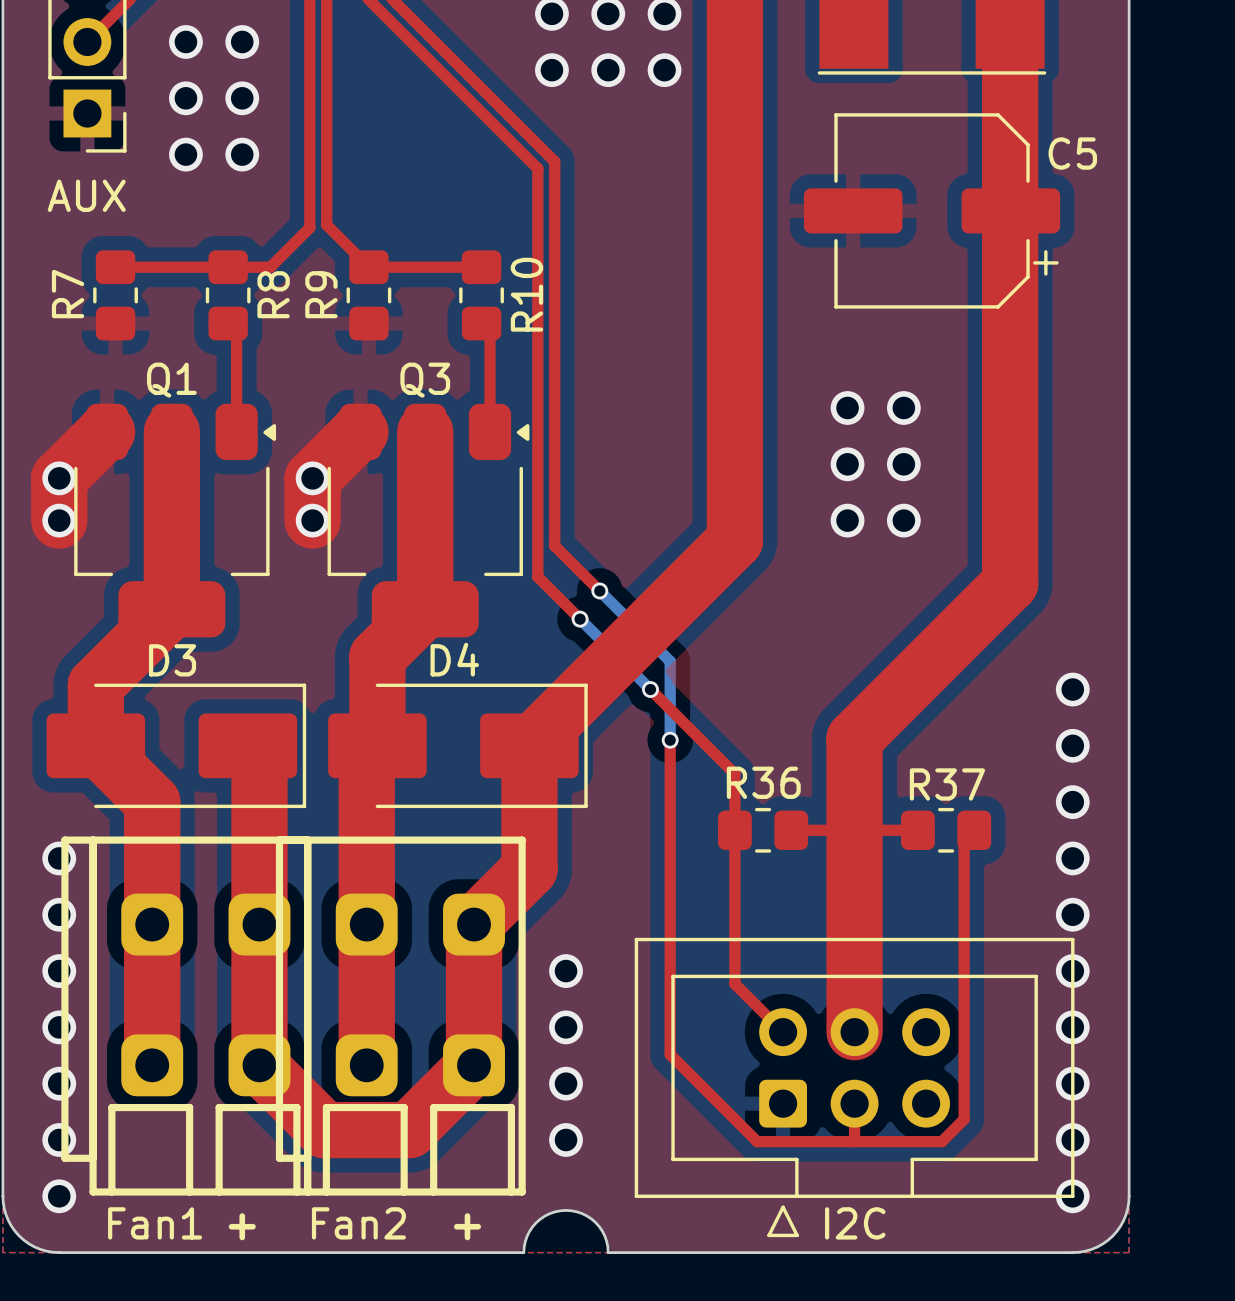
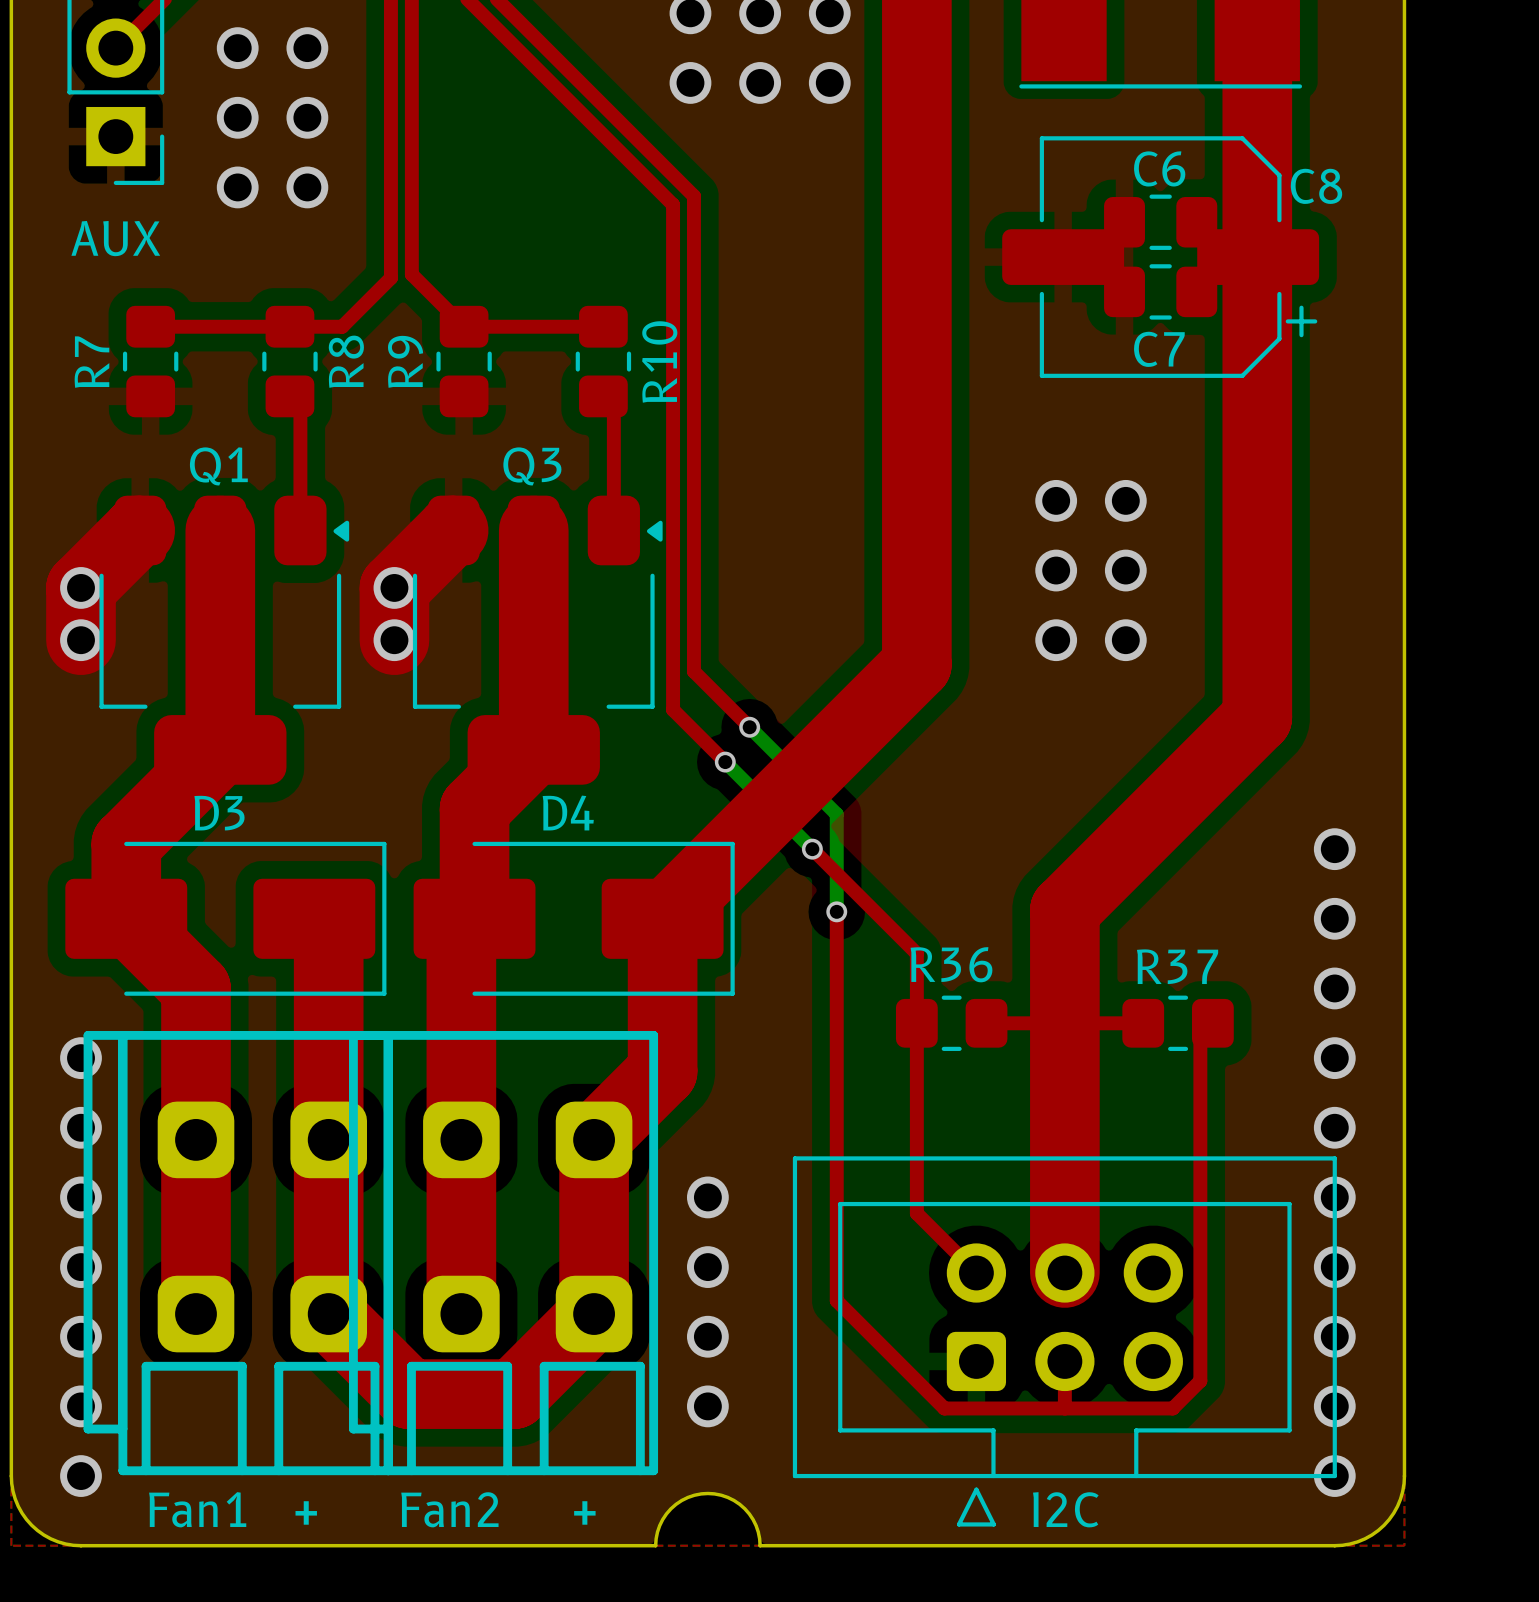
C5 name: C5 (1072, 153) -> C8 (1316, 186)
C6: none -> (1160, 222)
C7: none -> (1160, 291)

